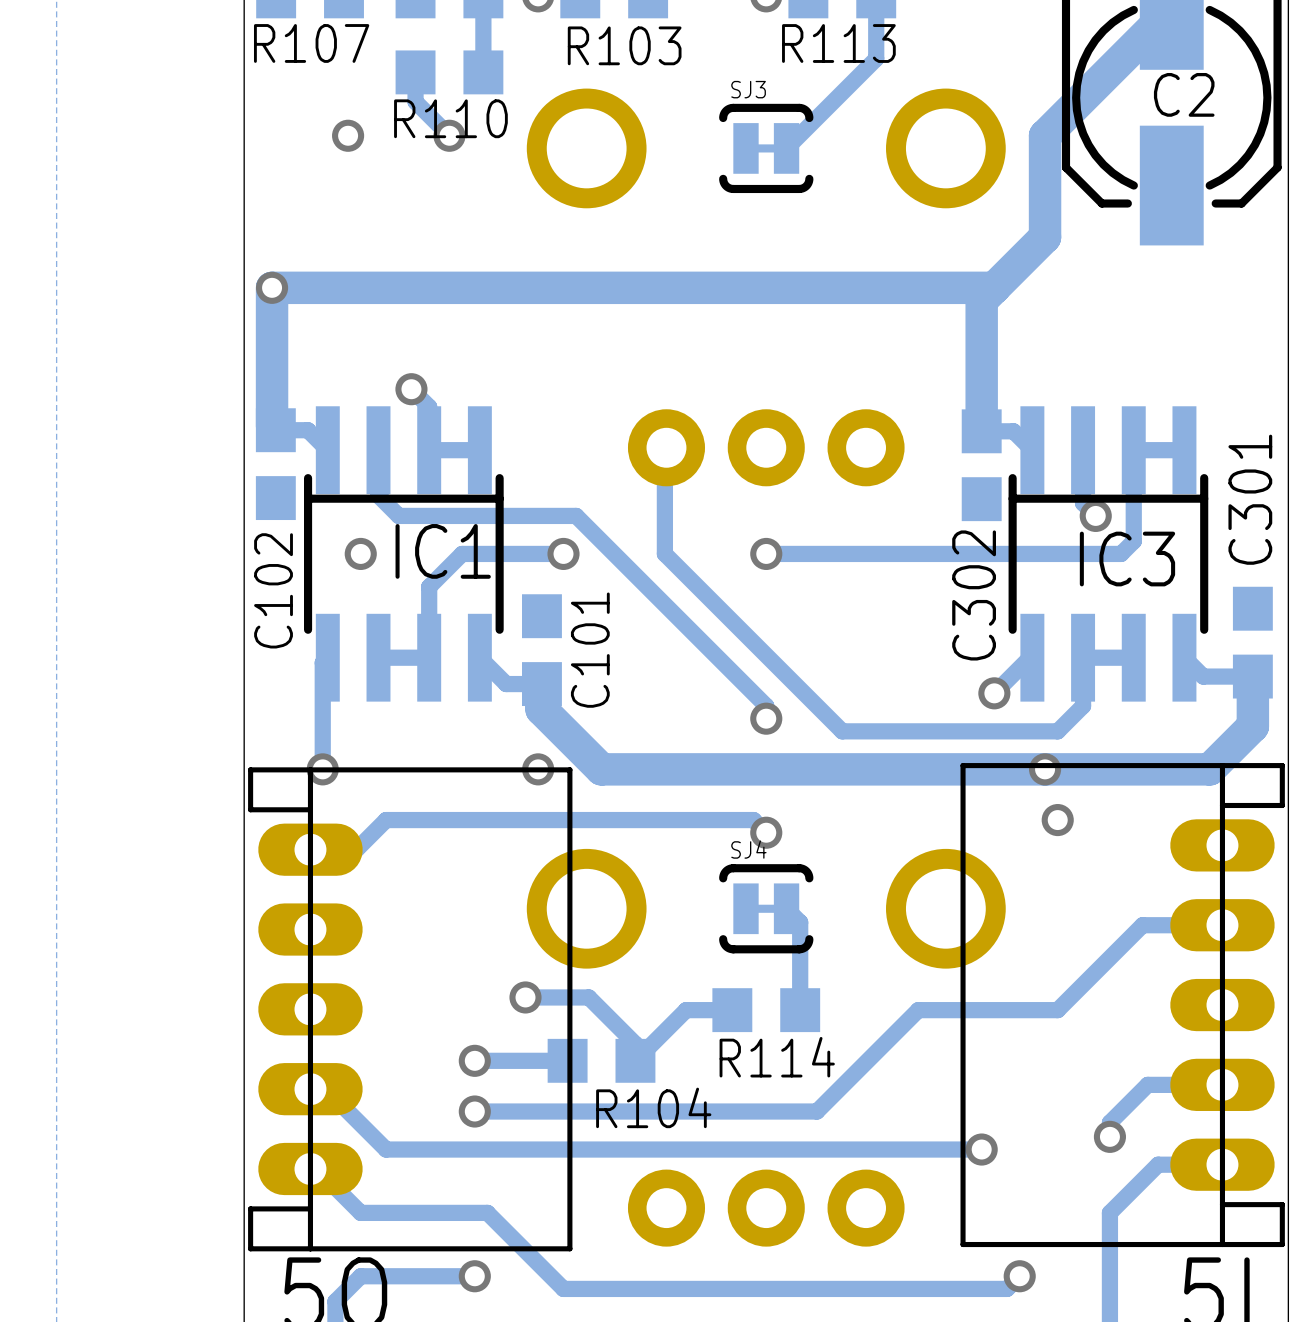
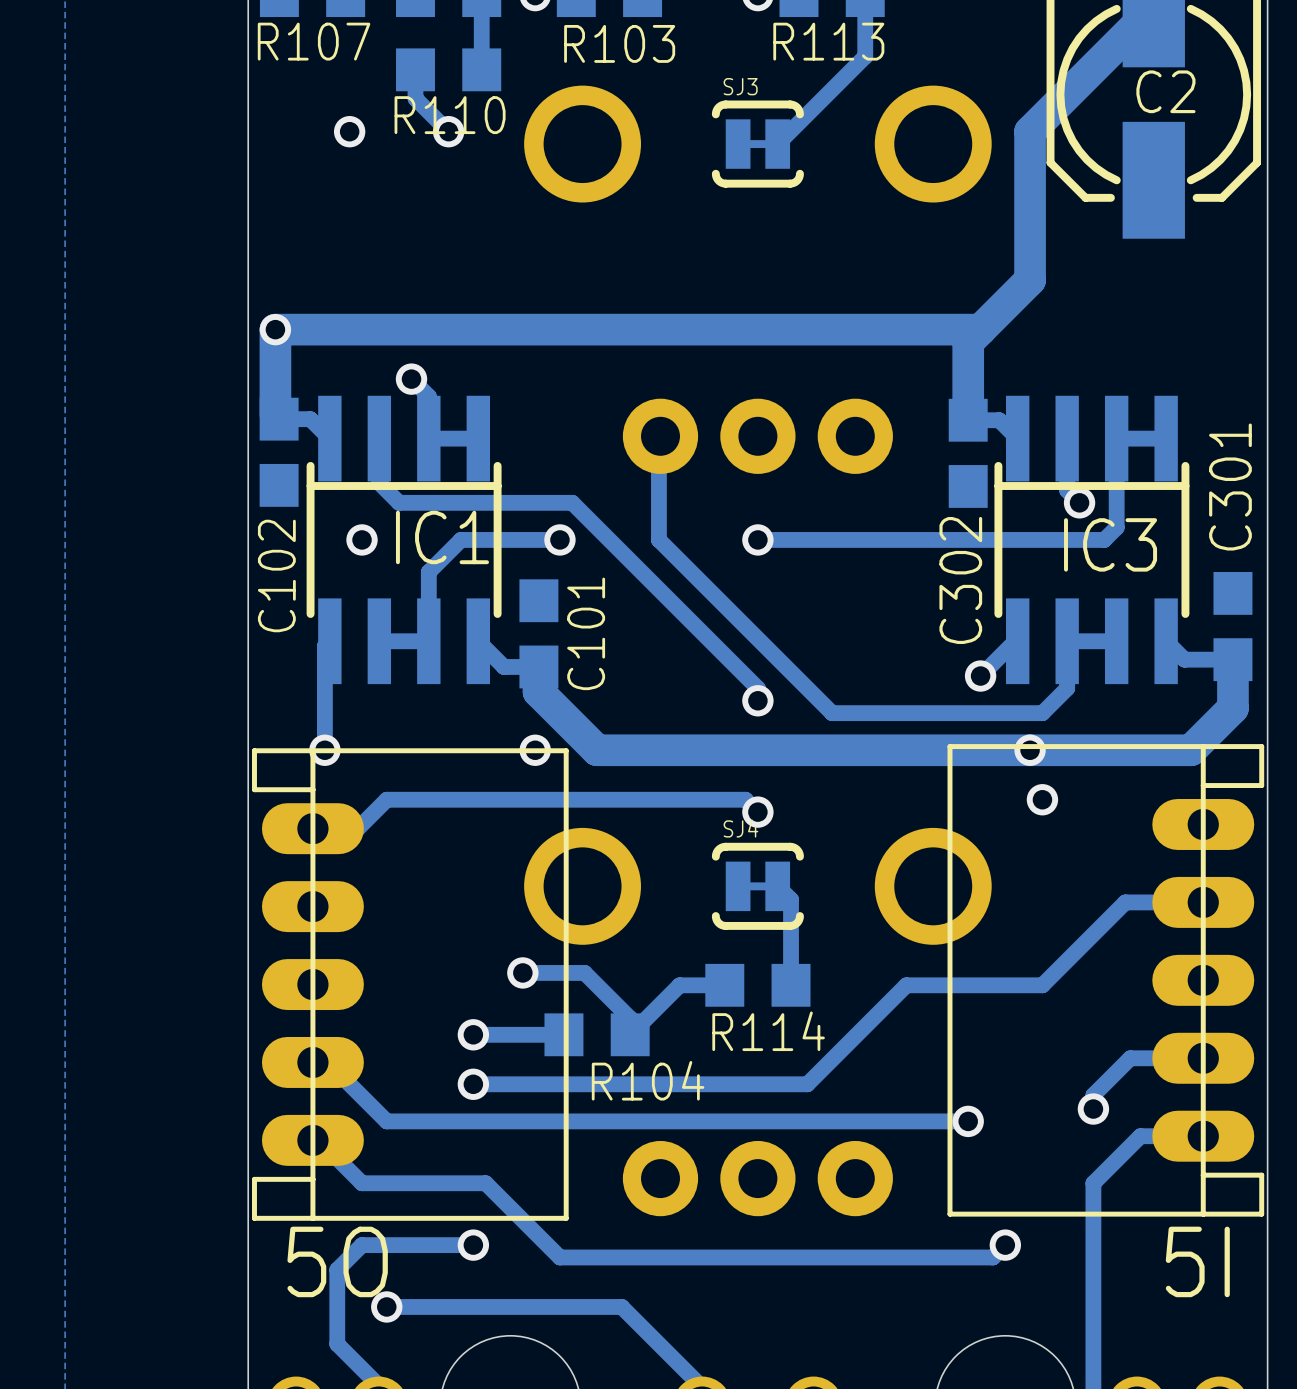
track: (1045, 237) (981, 300) (981, 351) -> (1030, 230) (1030, 280) (968, 342)
via position: (272, 287) -> (275, 329)
track: (994, 287) (272, 287) (272, 338) -> (980, 329) (275, 329)

